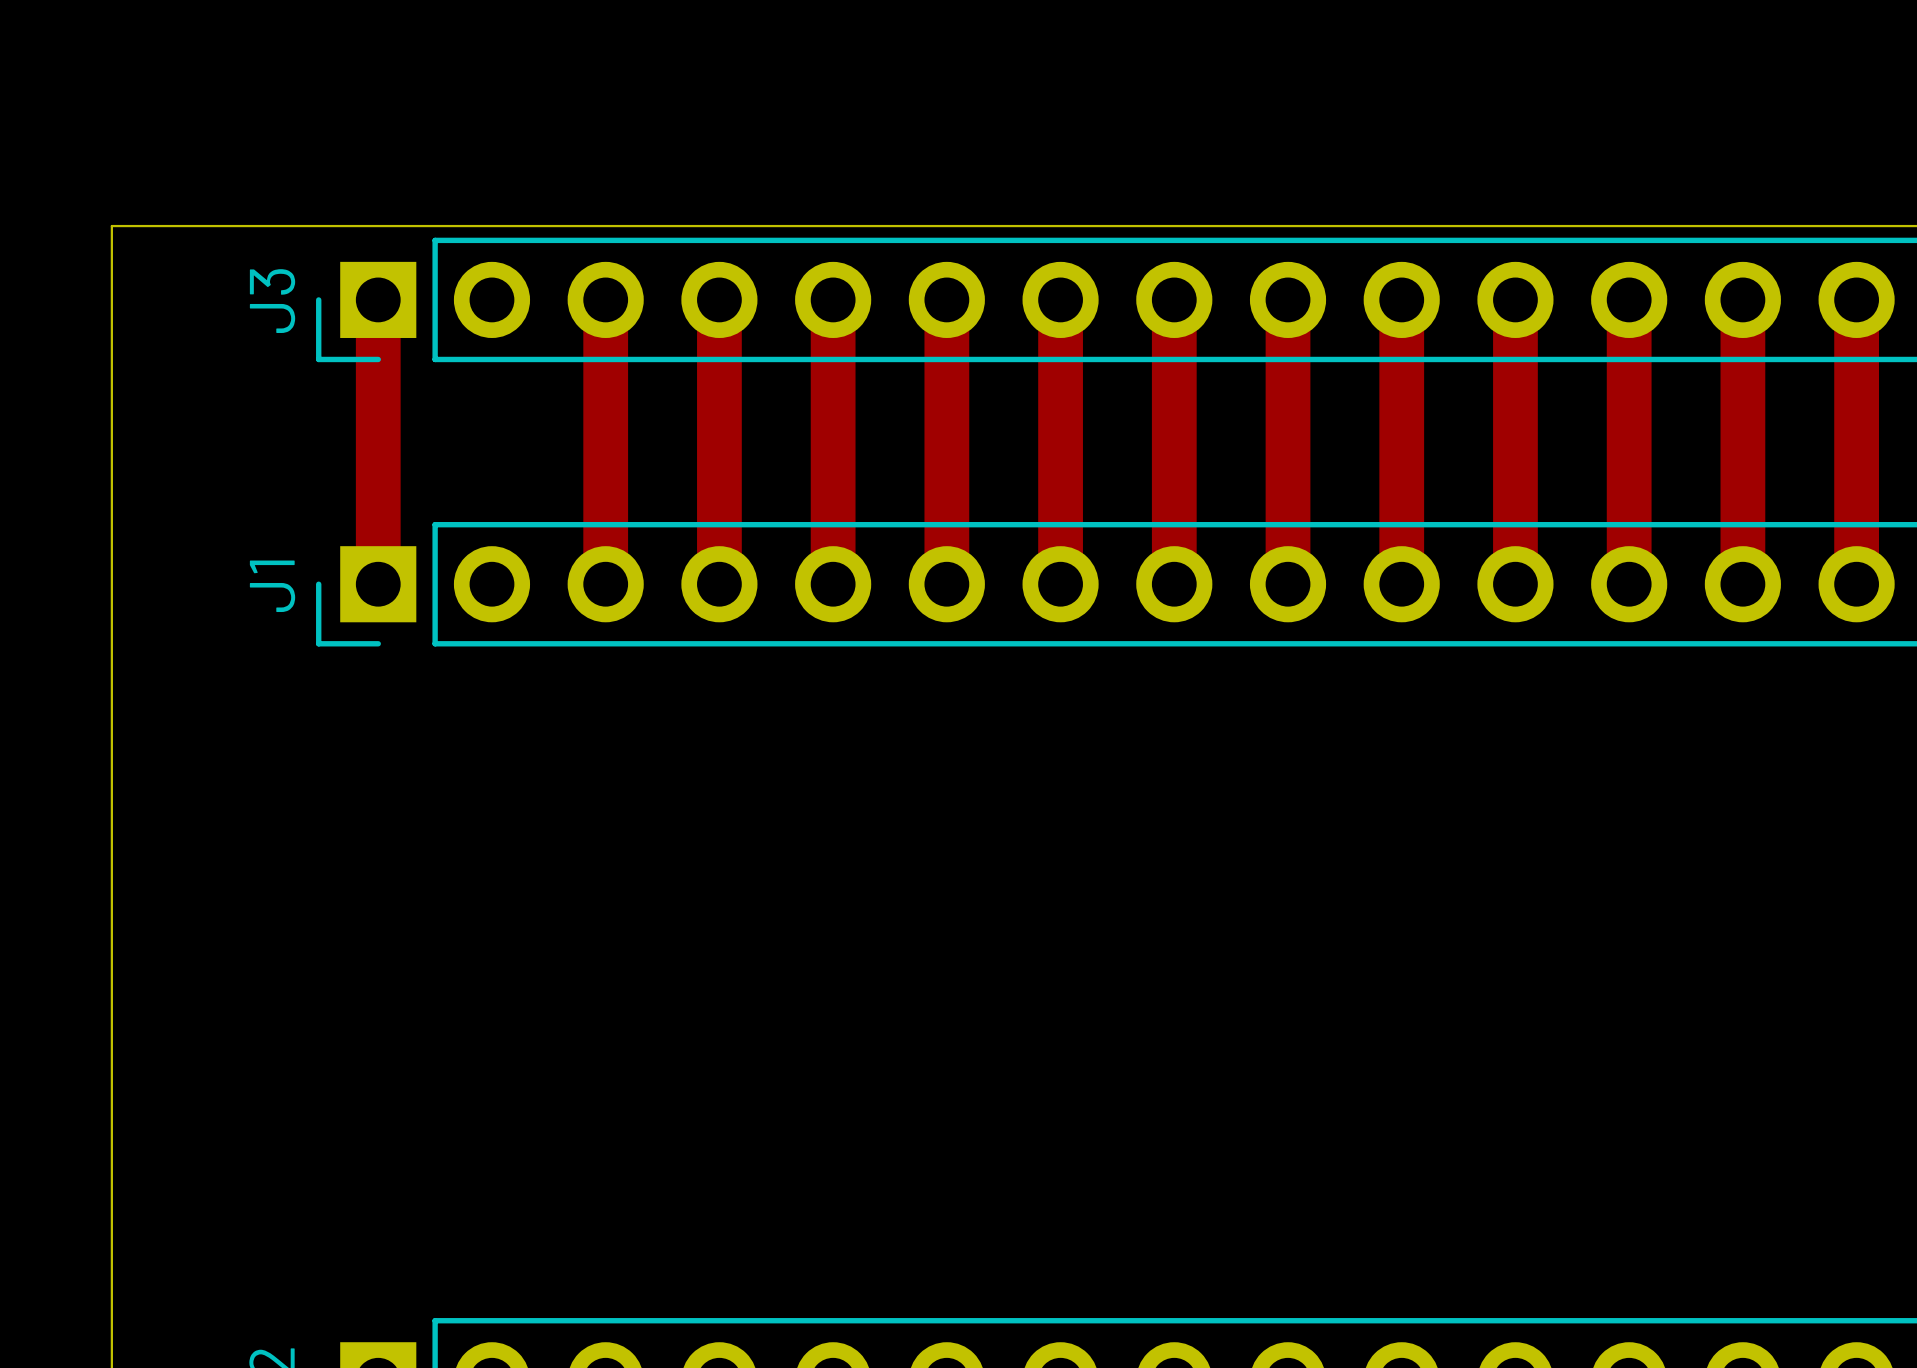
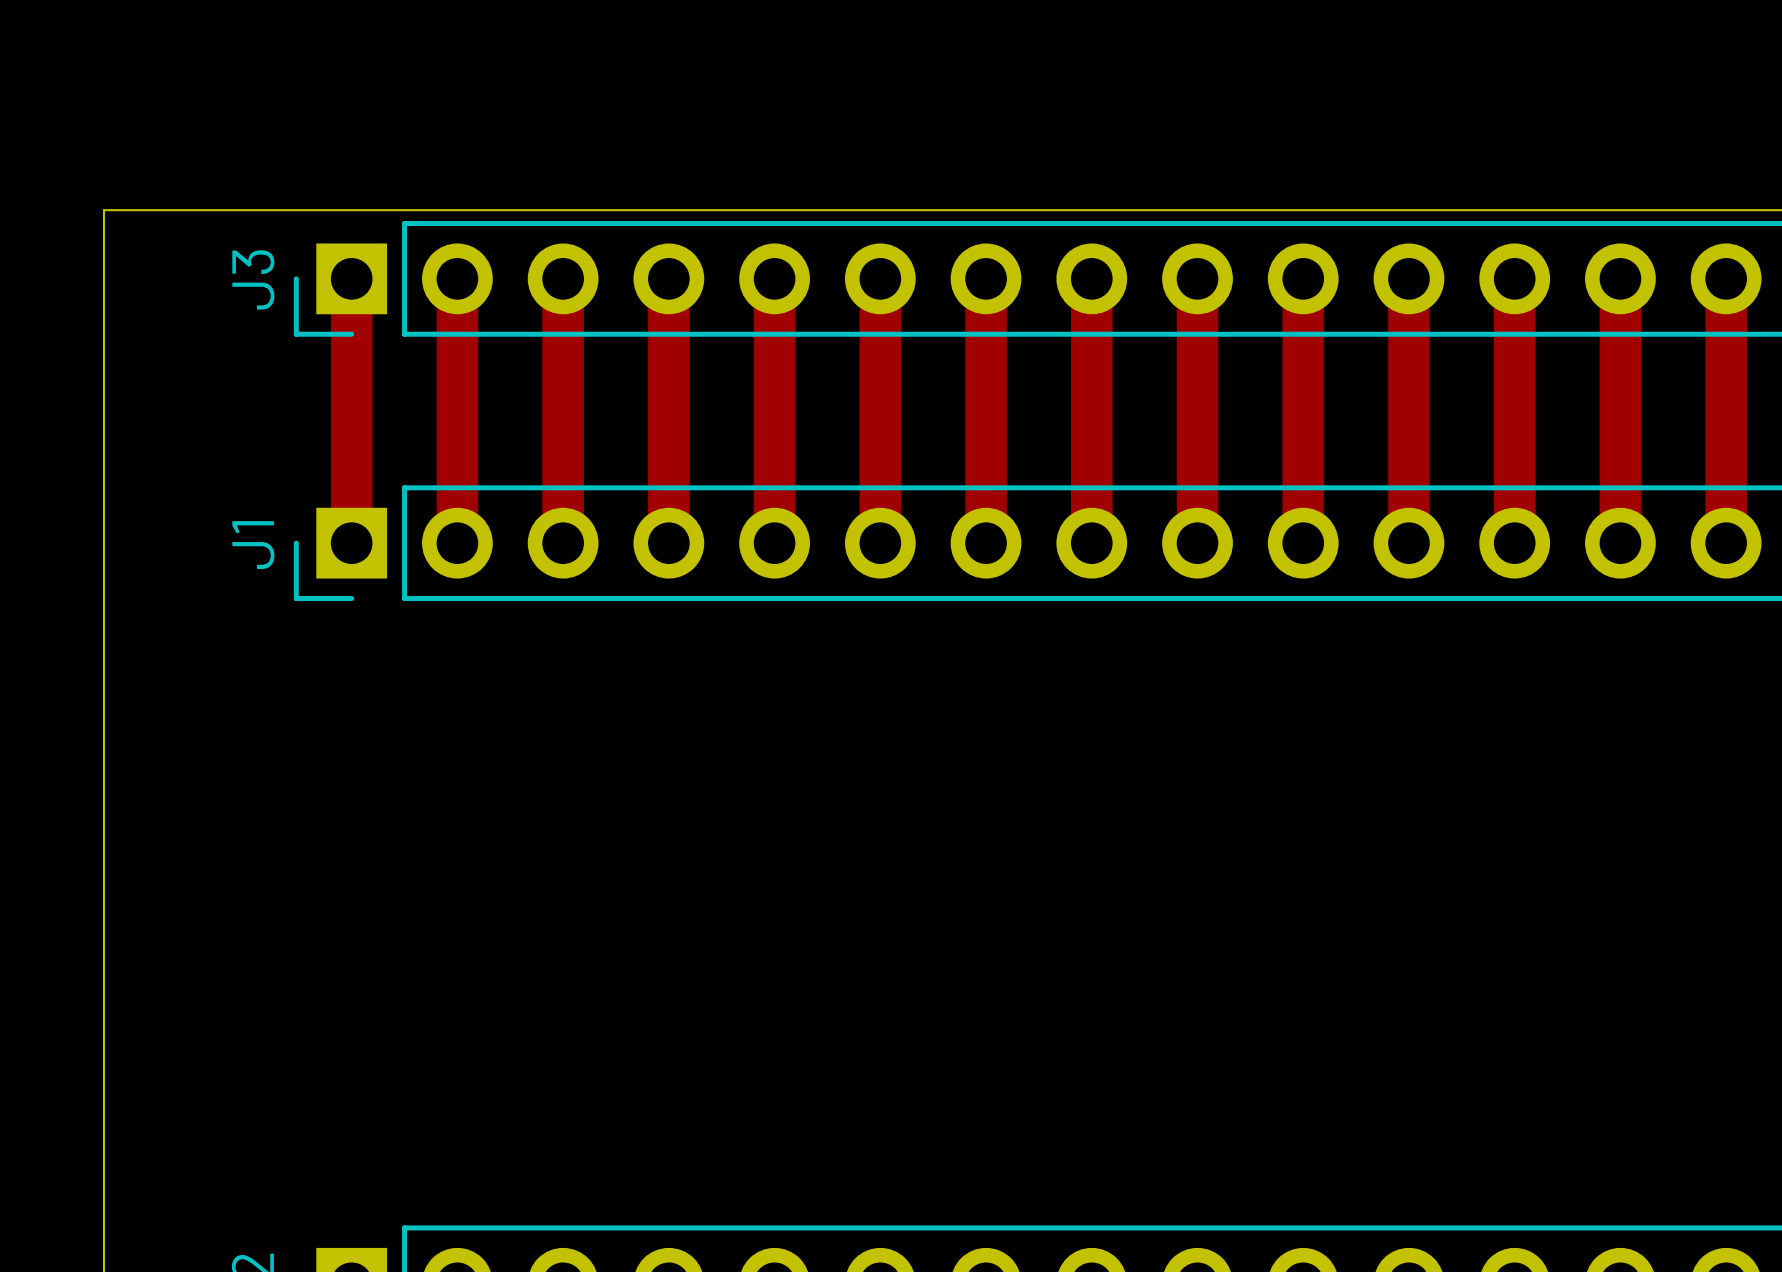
top track: none -> (457, 278) (457, 543)

